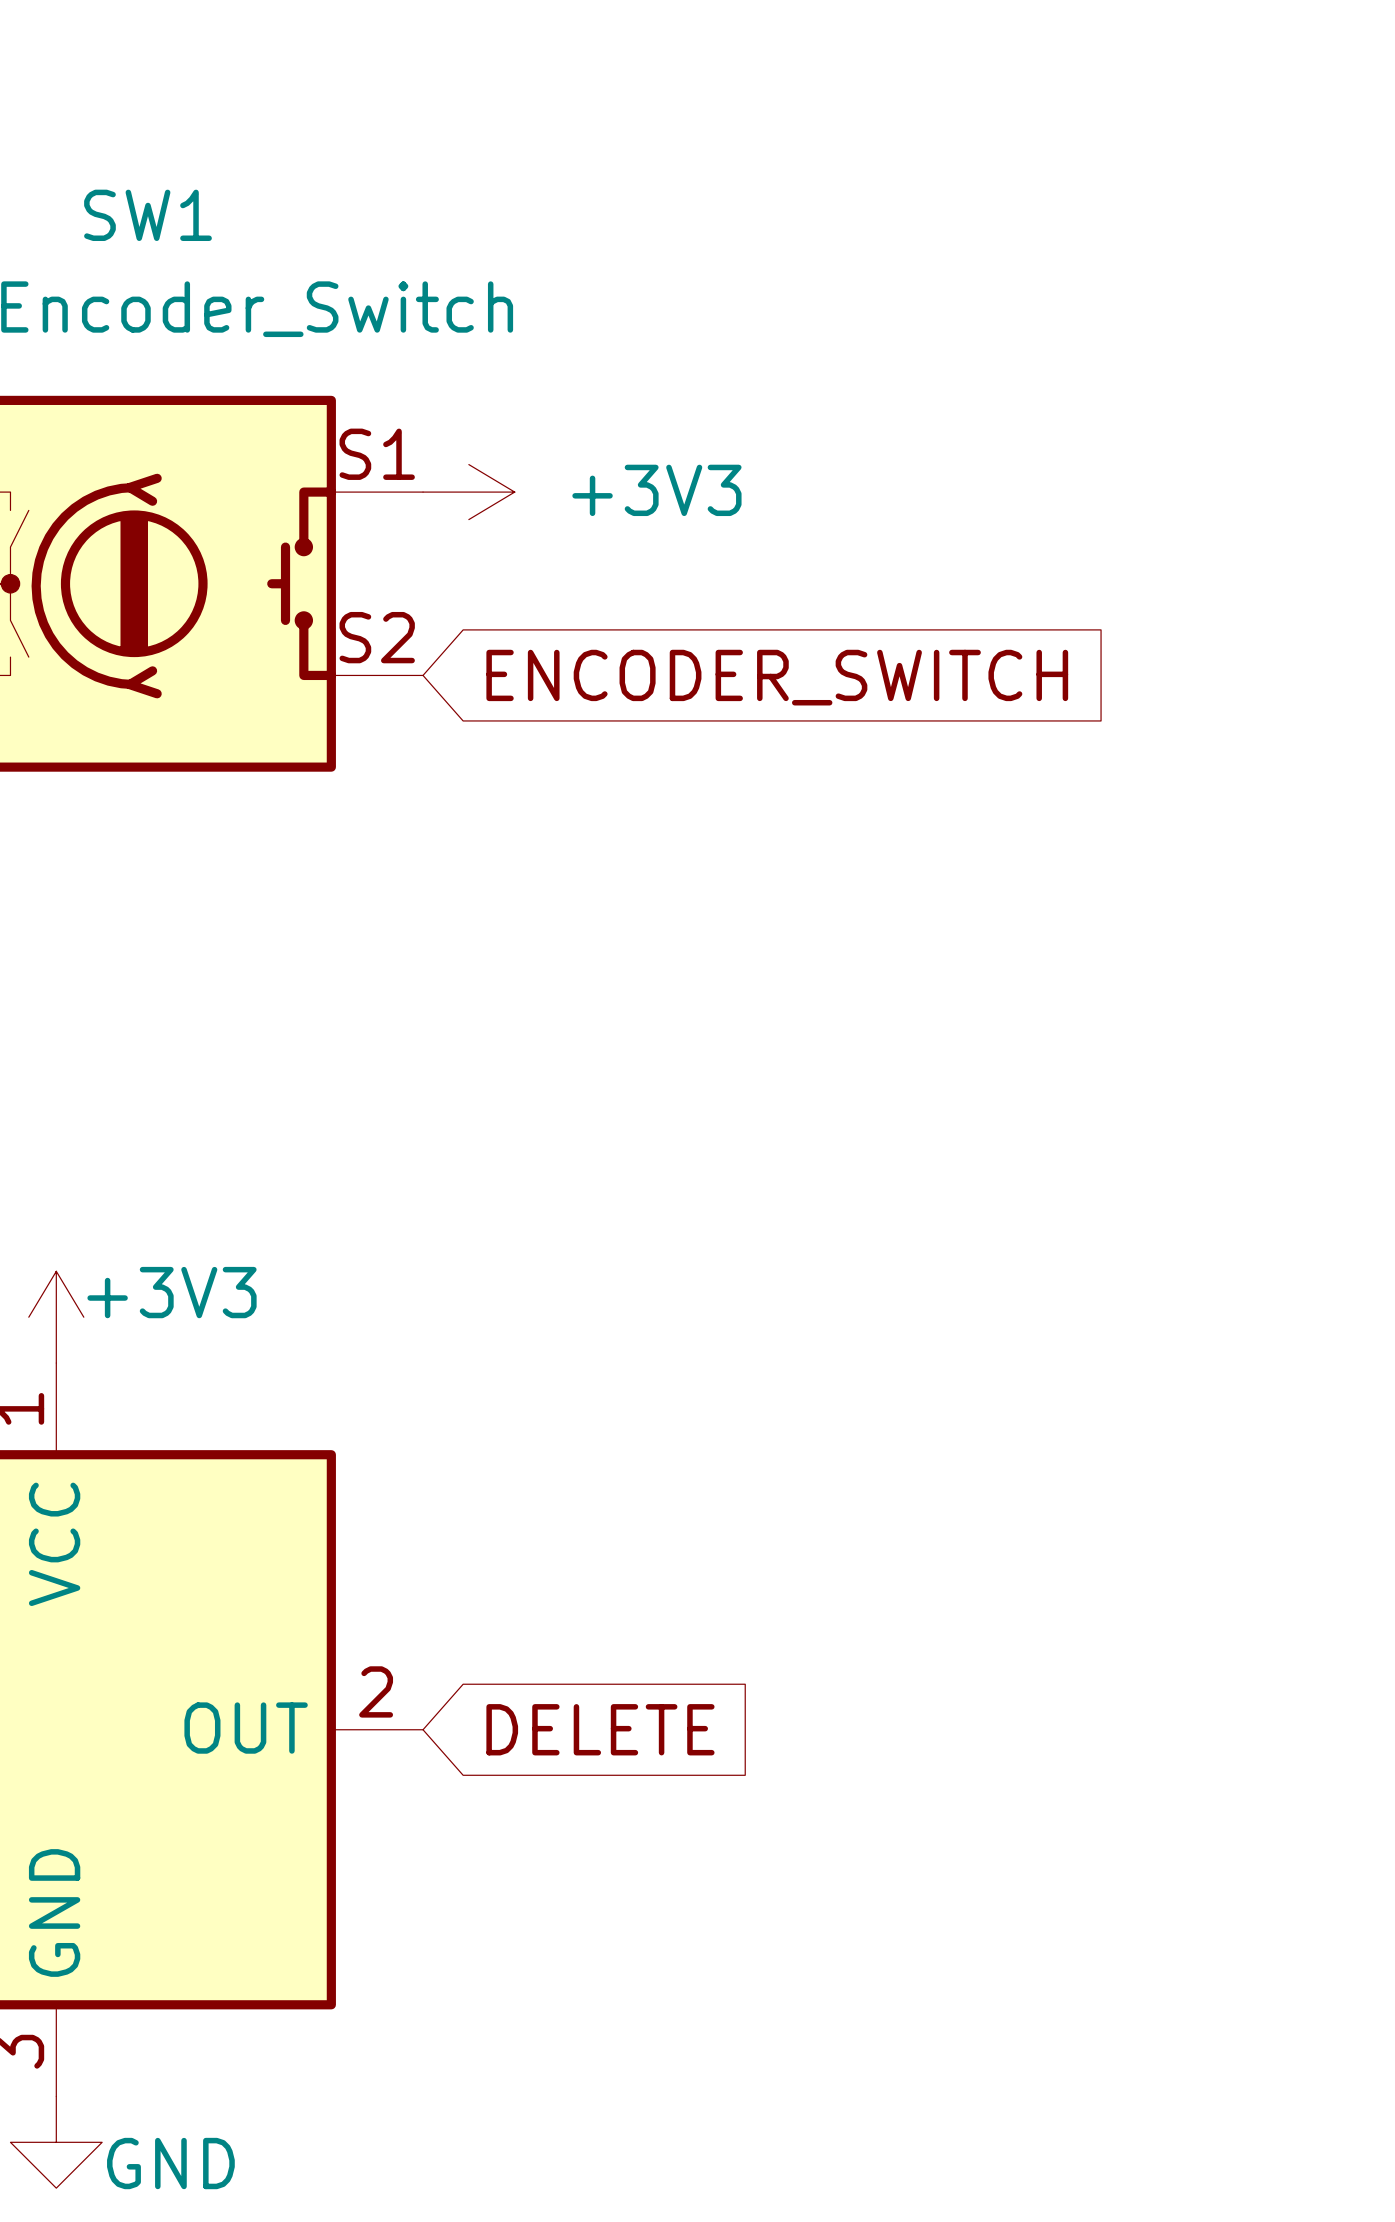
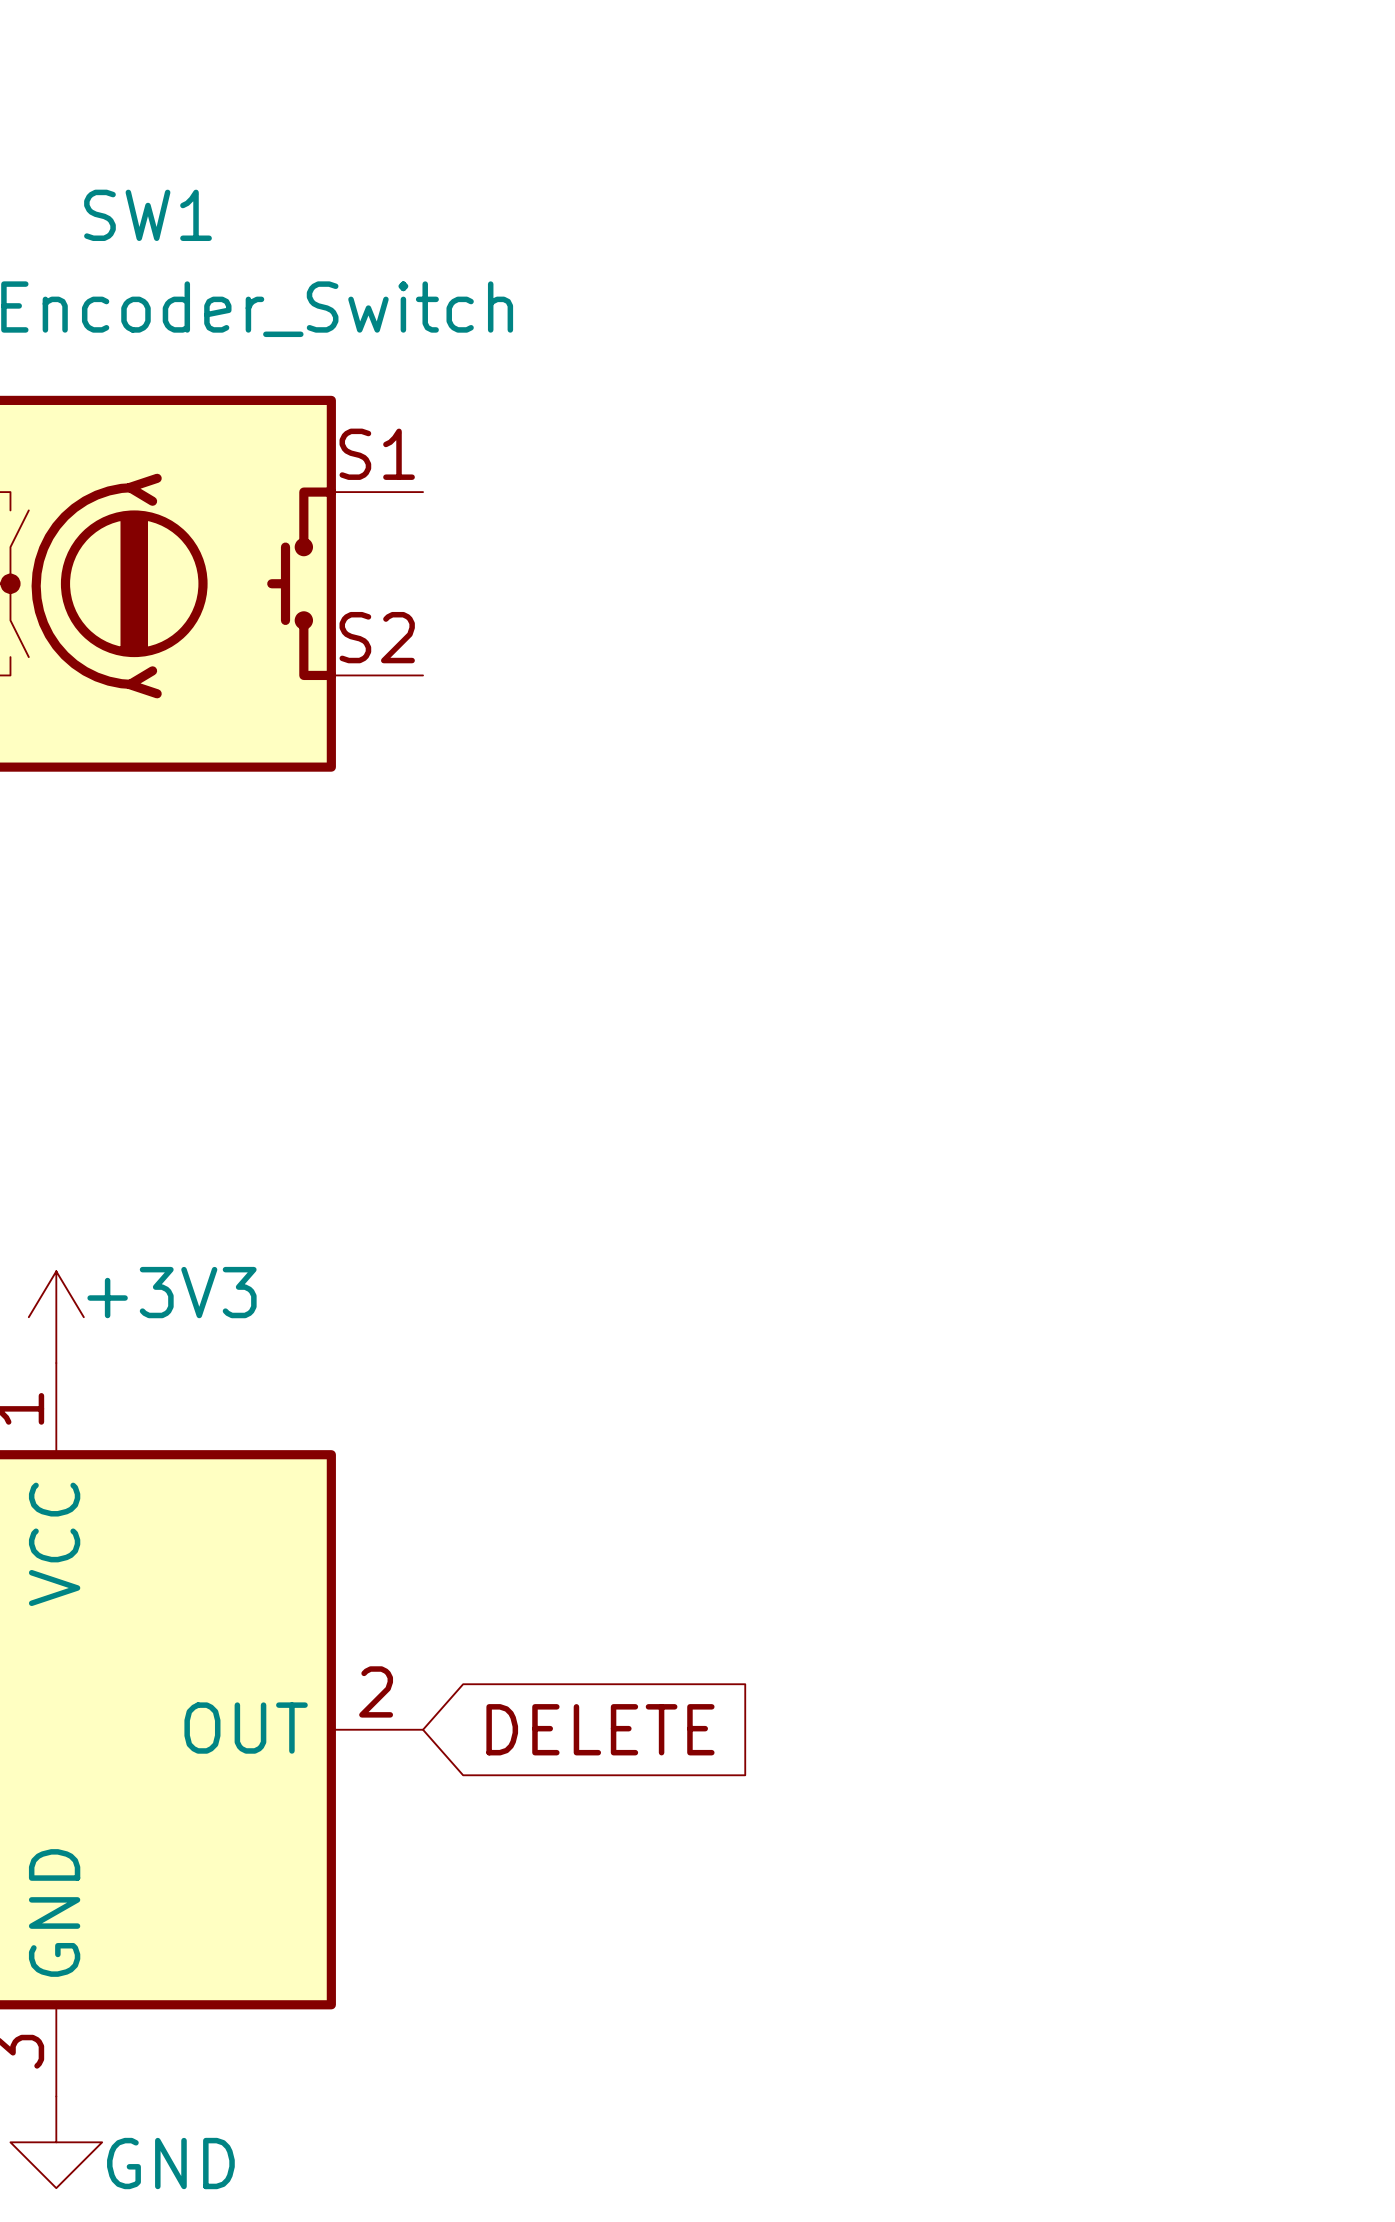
power symbol: +3V3 (468, 492) -> none
global label: ENCODER_SWITCH (777, 677) -> none

